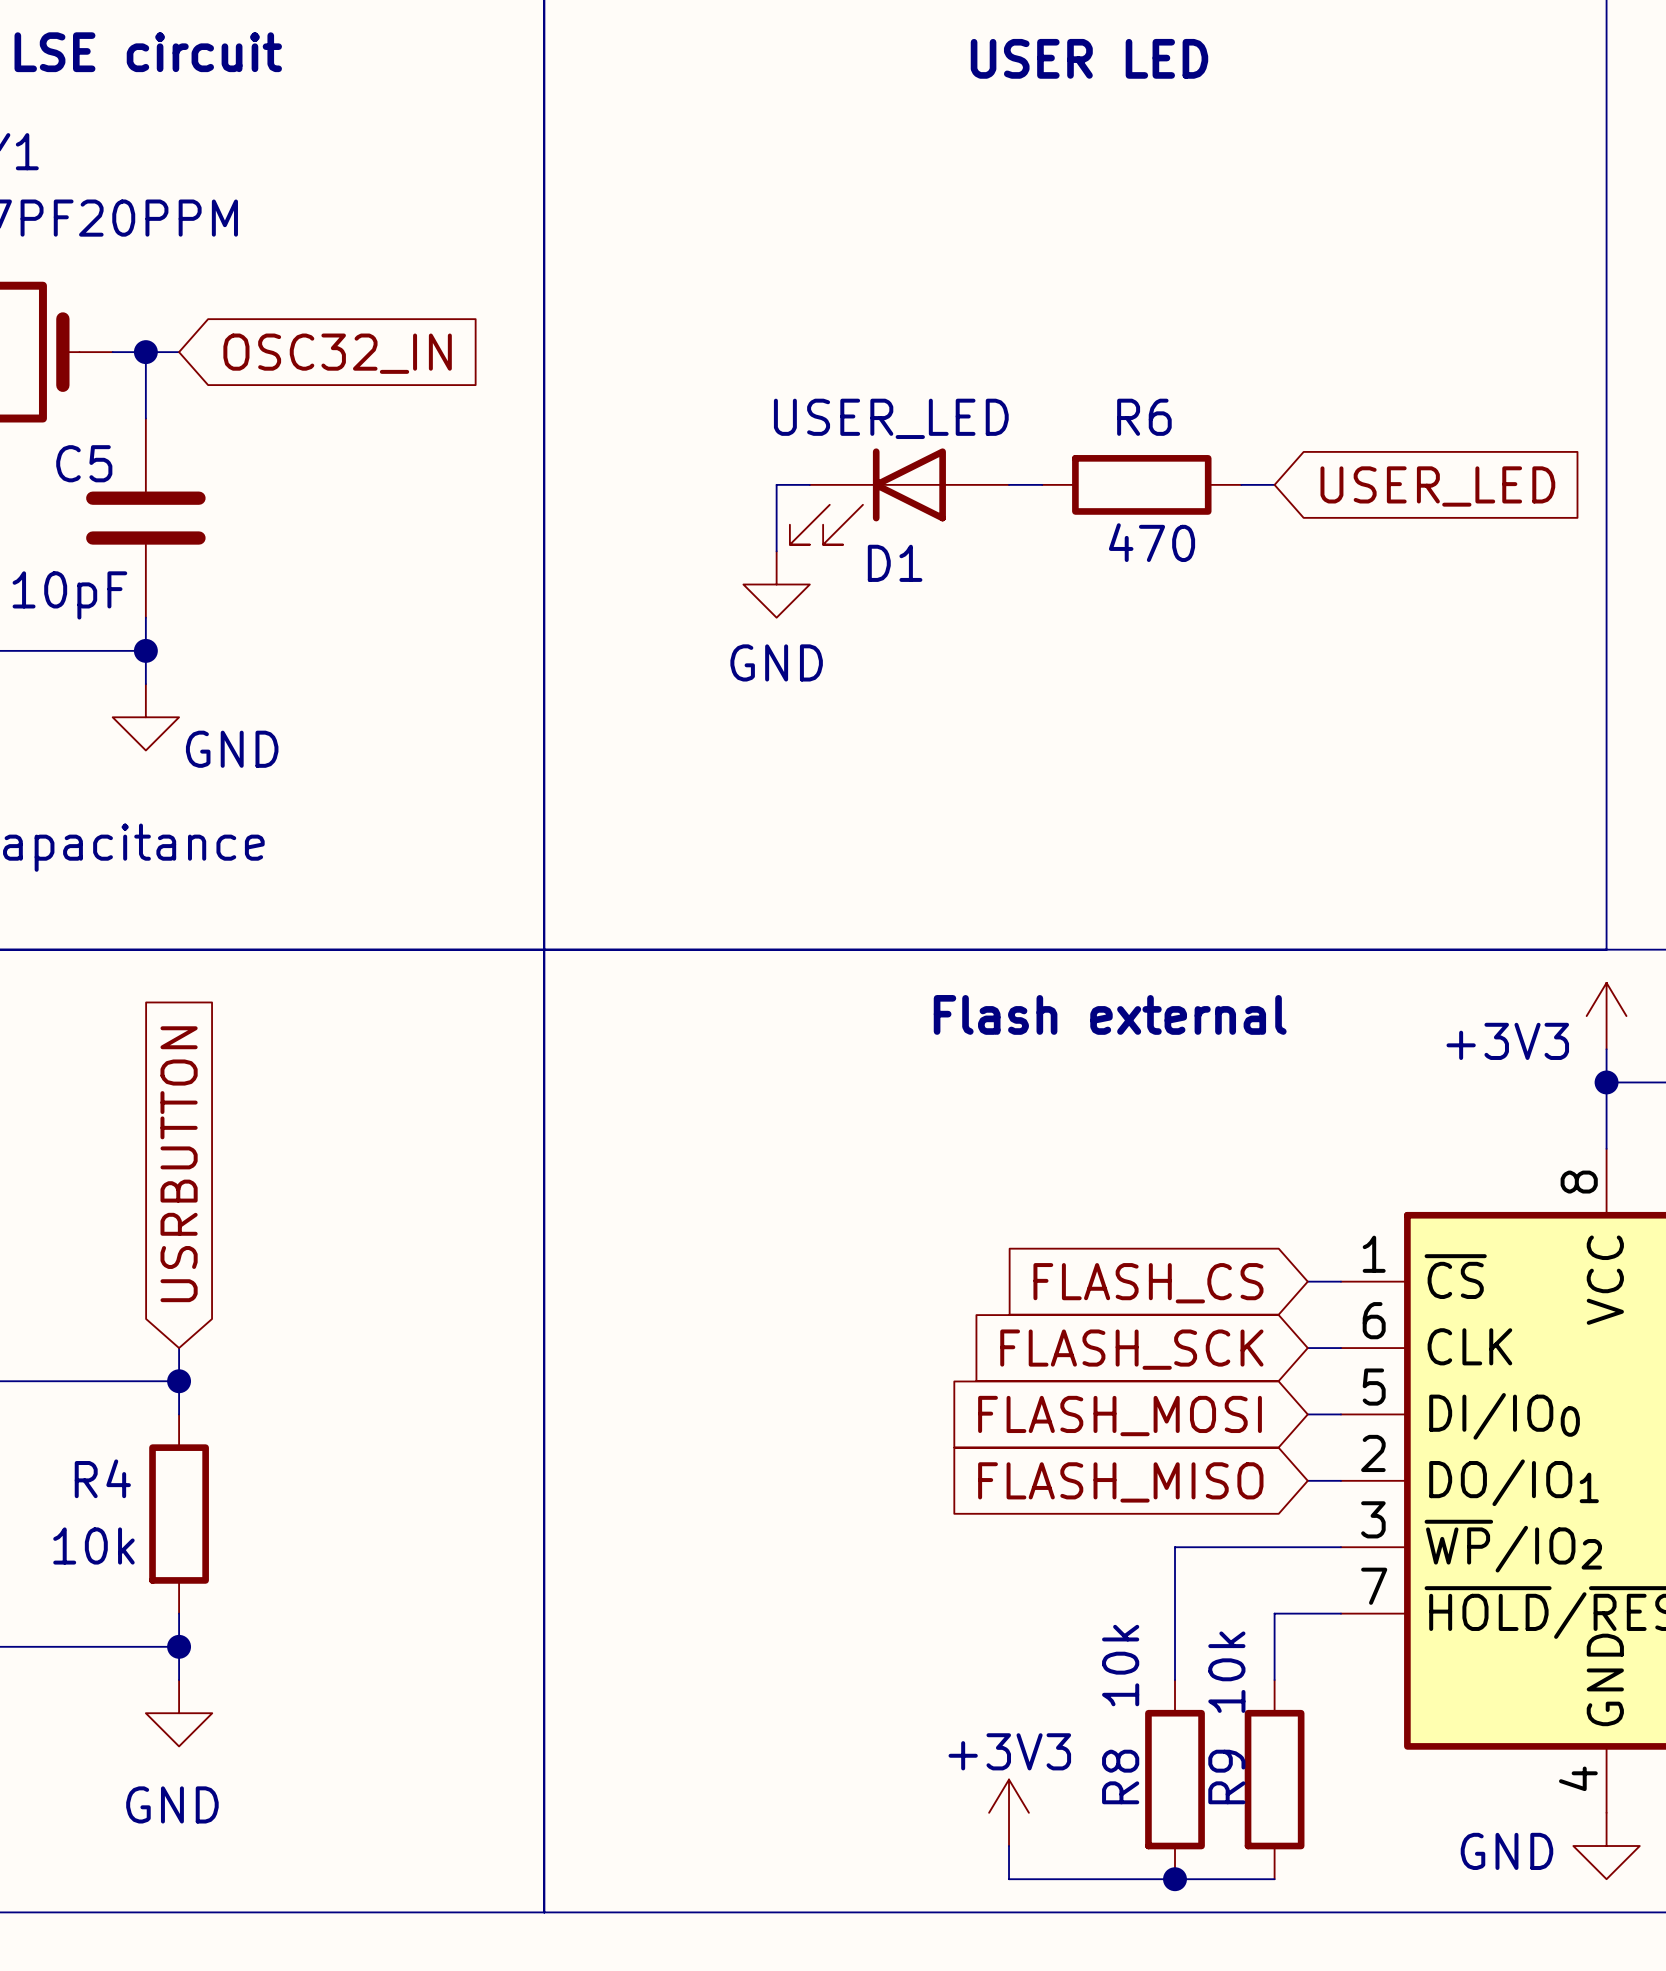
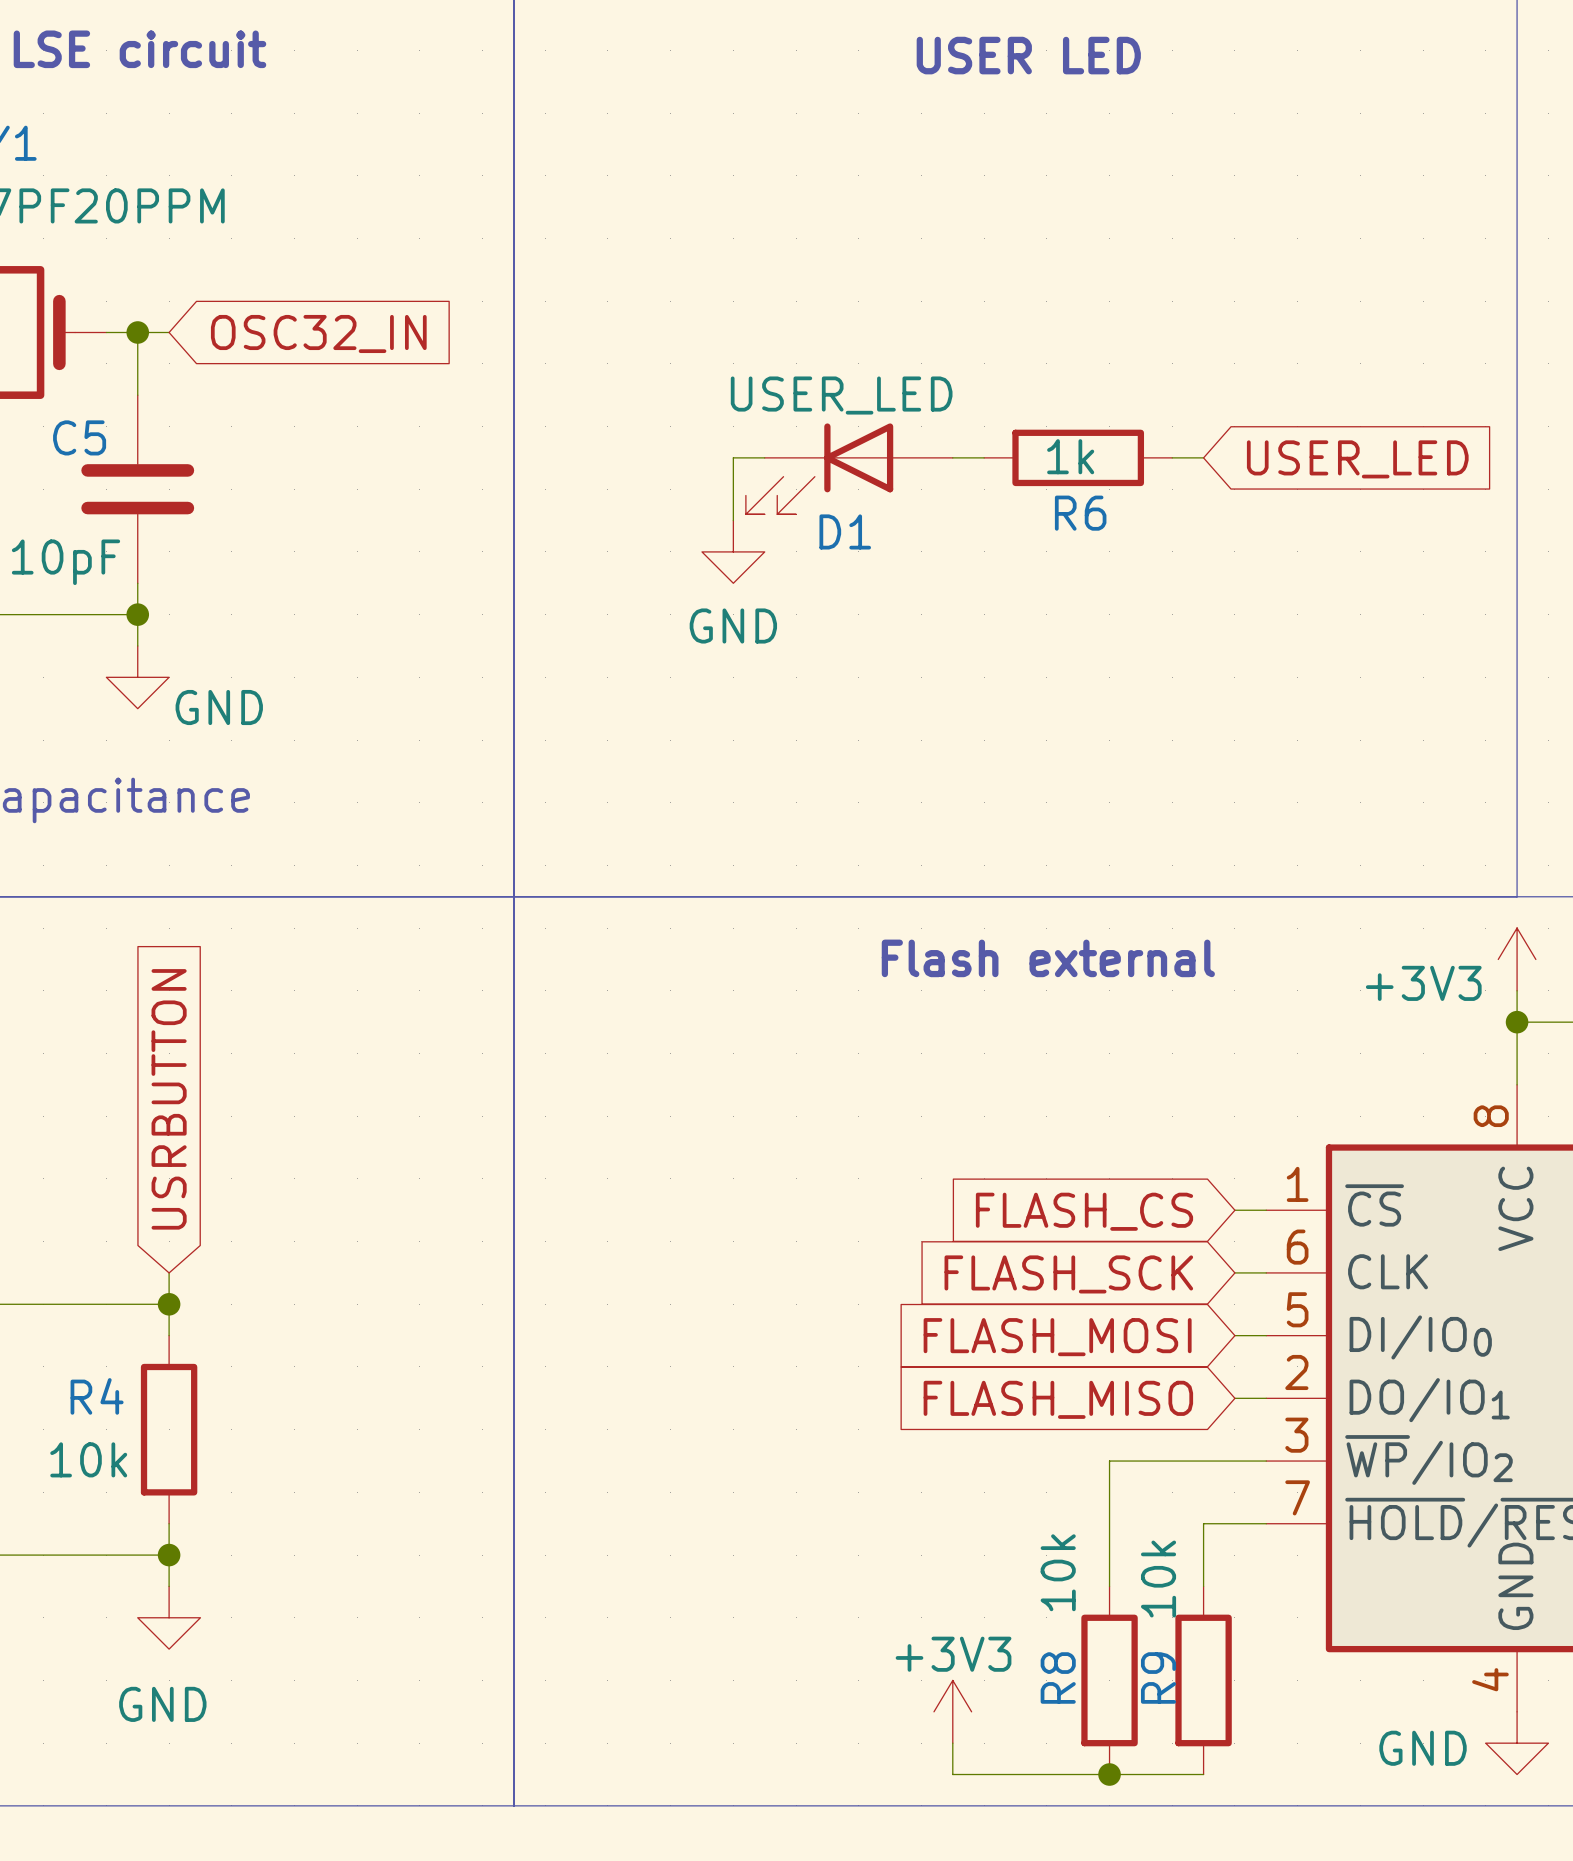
R6 name position: R6 (1144, 417) -> R6 (1080, 513)
R6 value: 470 (1152, 542) -> 1k (1070, 456)

